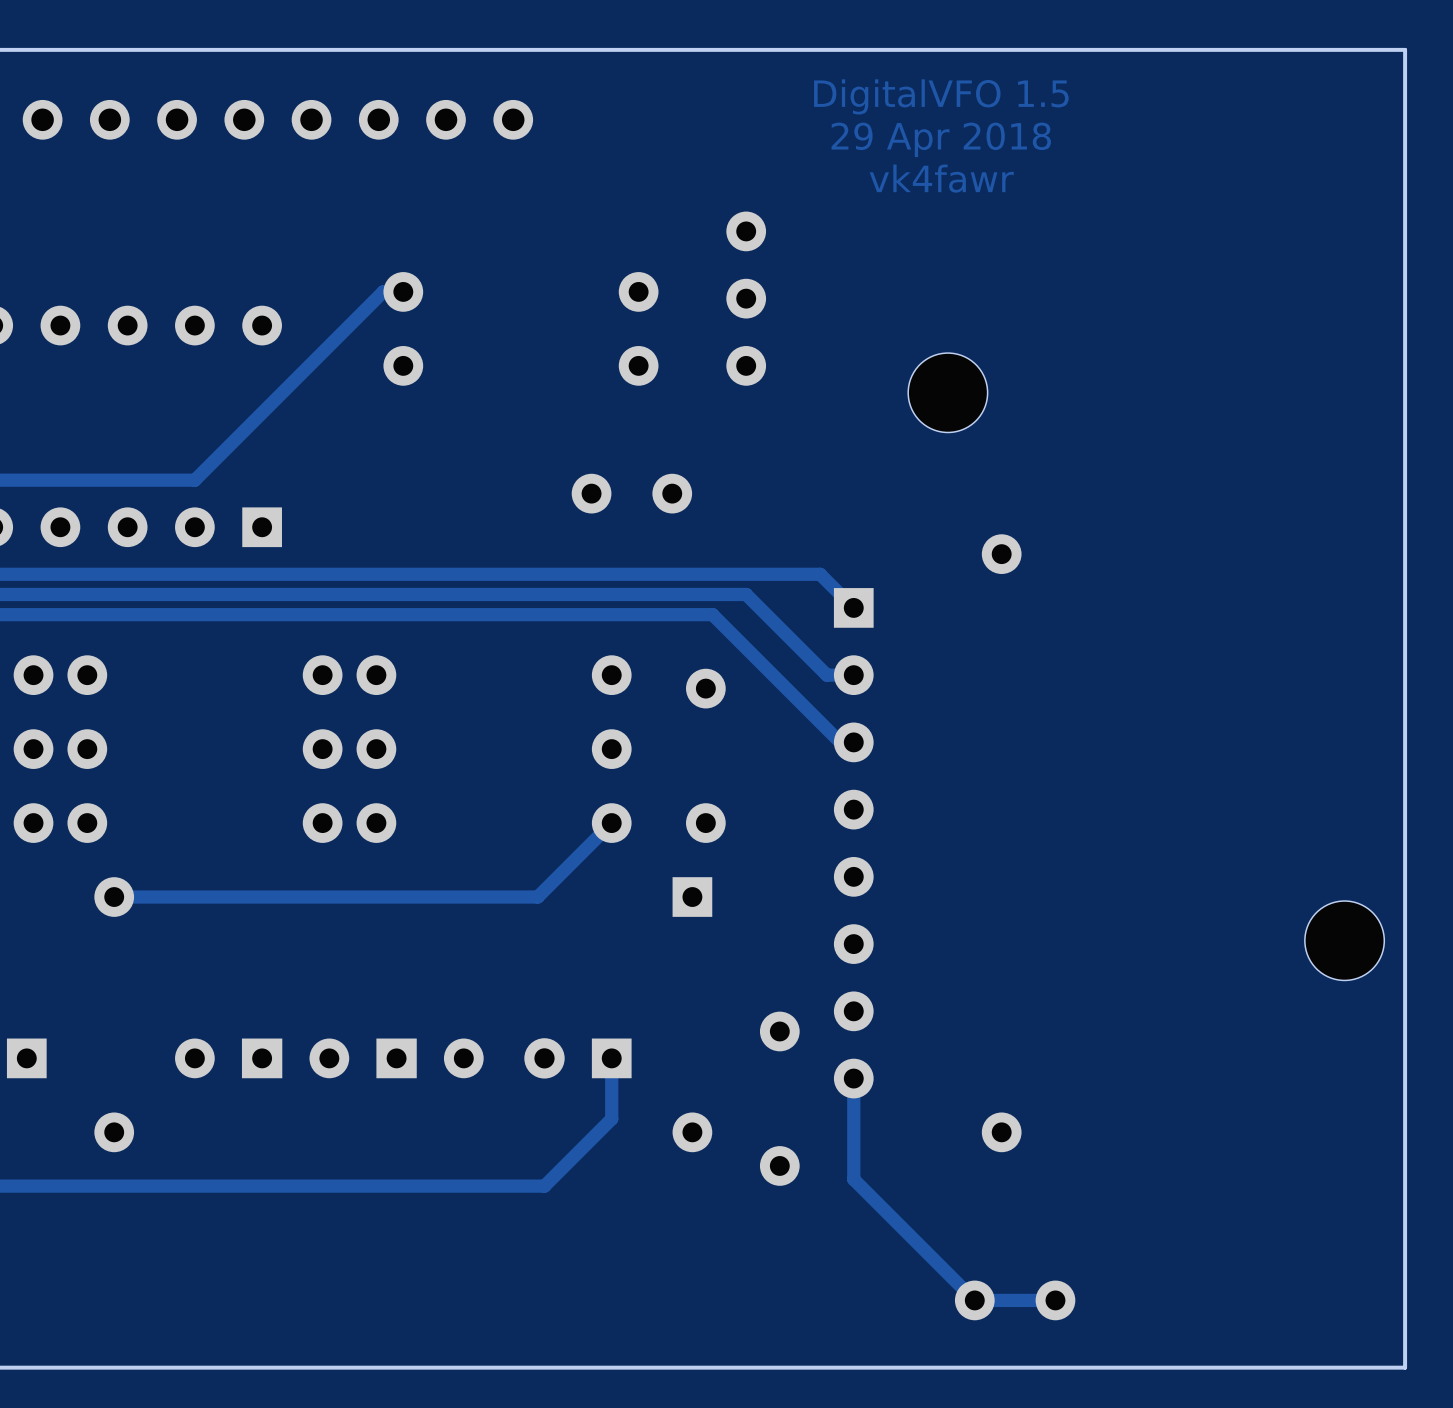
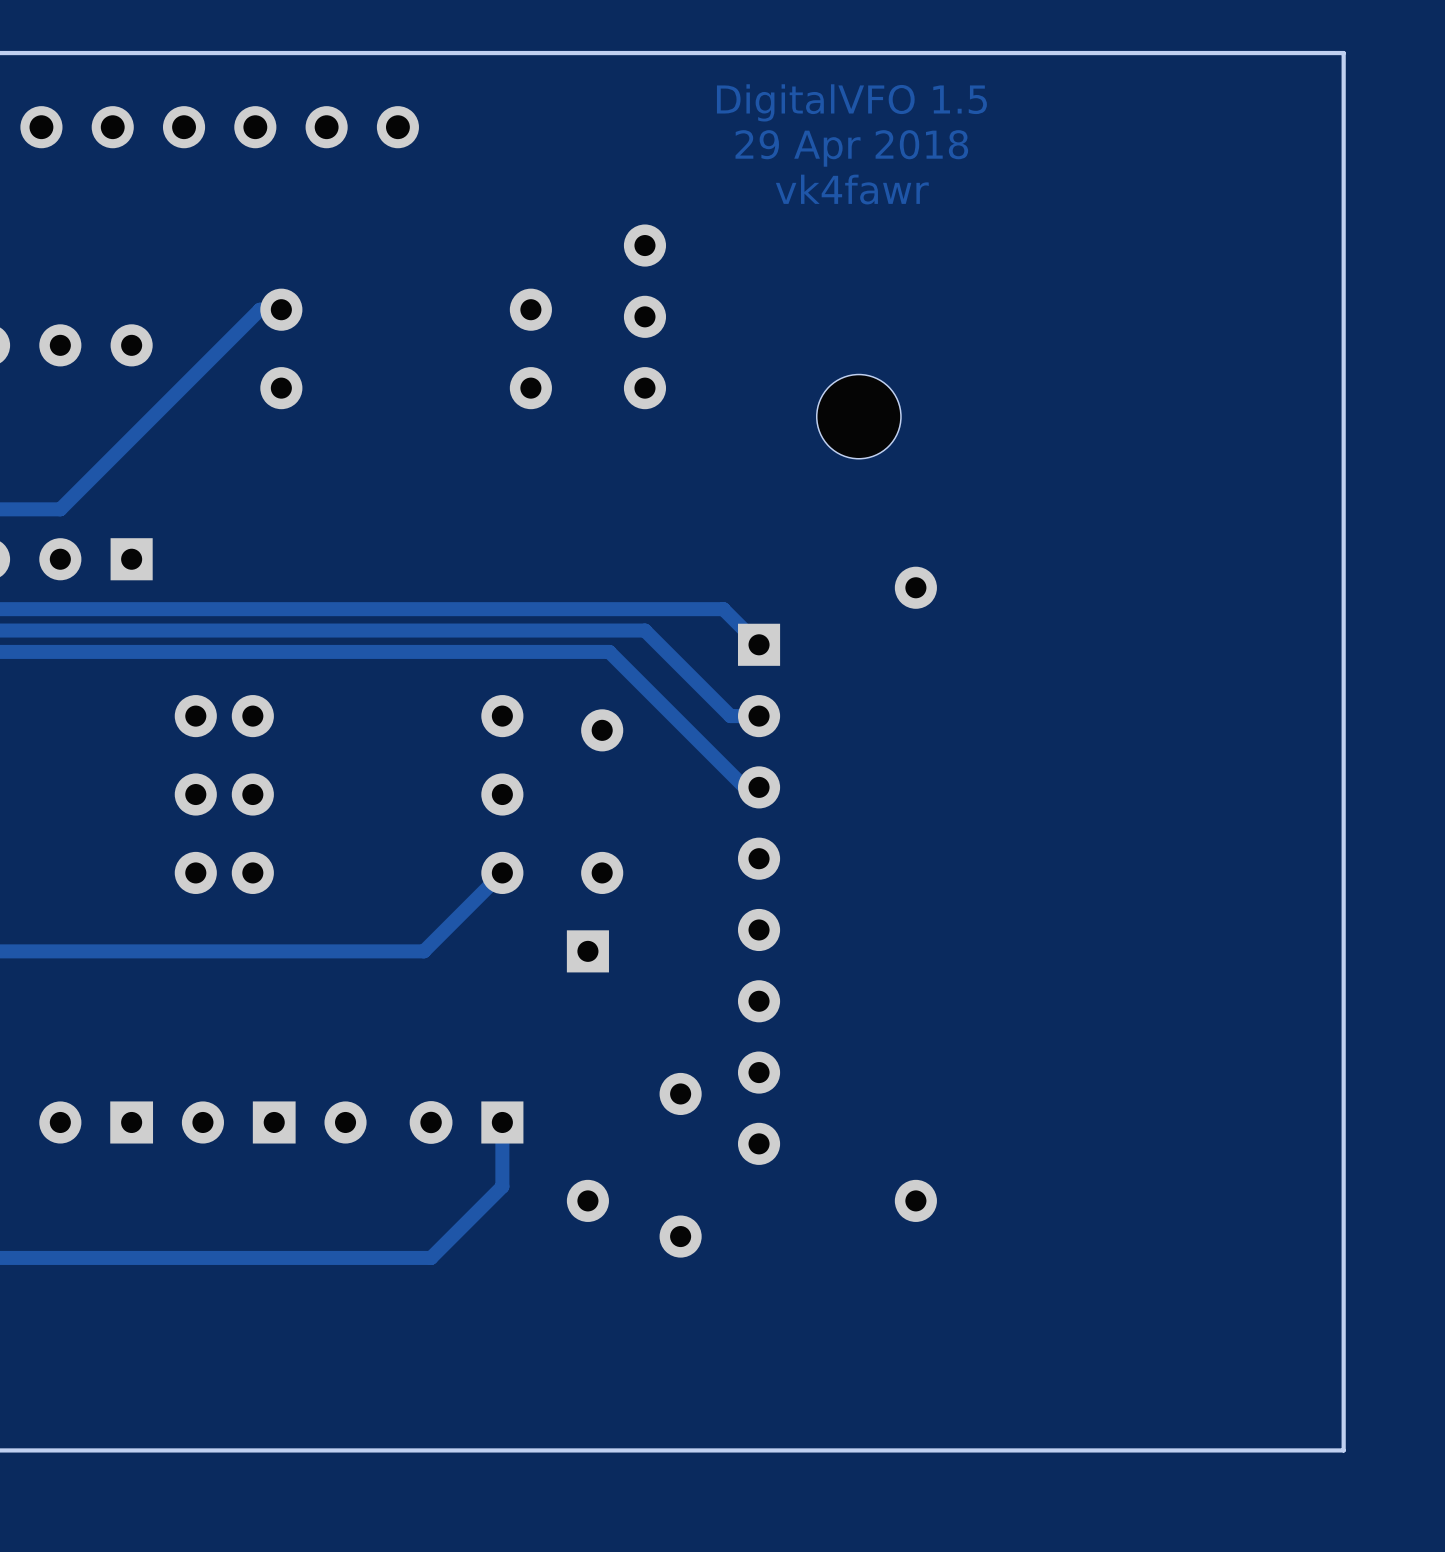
part: (631, 493) -> none
part: (1344, 940) -> none
track: (853, 1078) (853, 1179) (974, 1300) (1055, 1300) -> none
part: (1015, 1300) -> none

